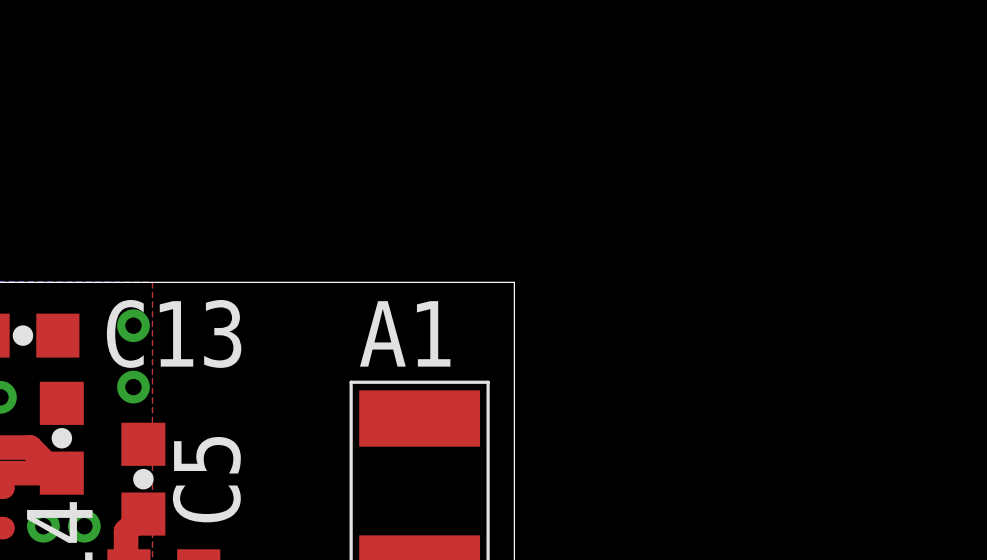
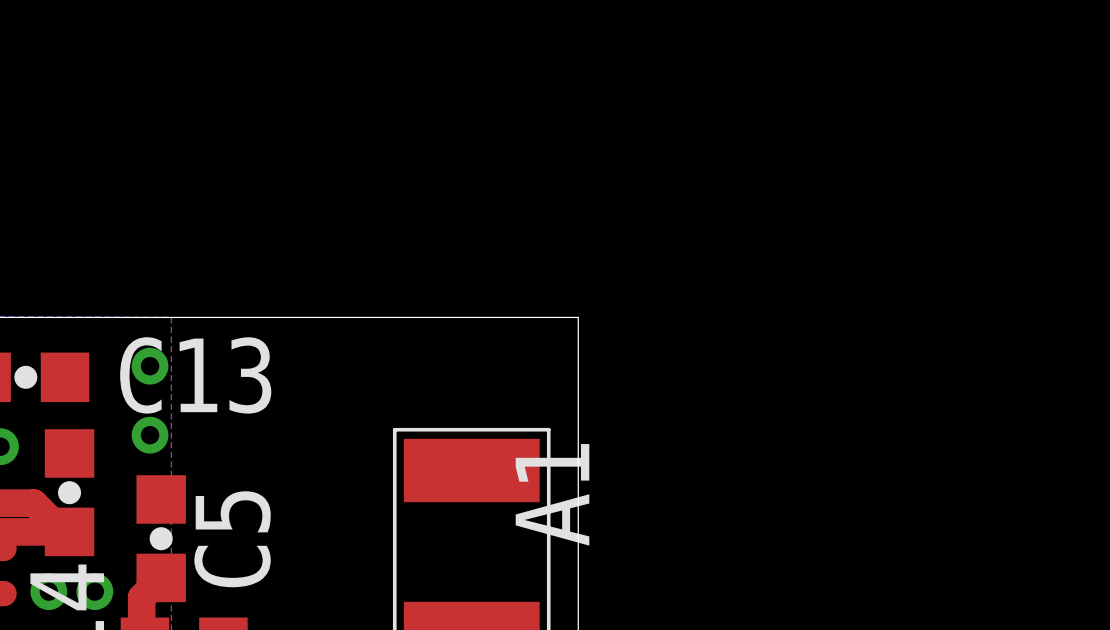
A1 name rotation: 0° (405, 333) -> 90° counterclockwise (552, 494)

